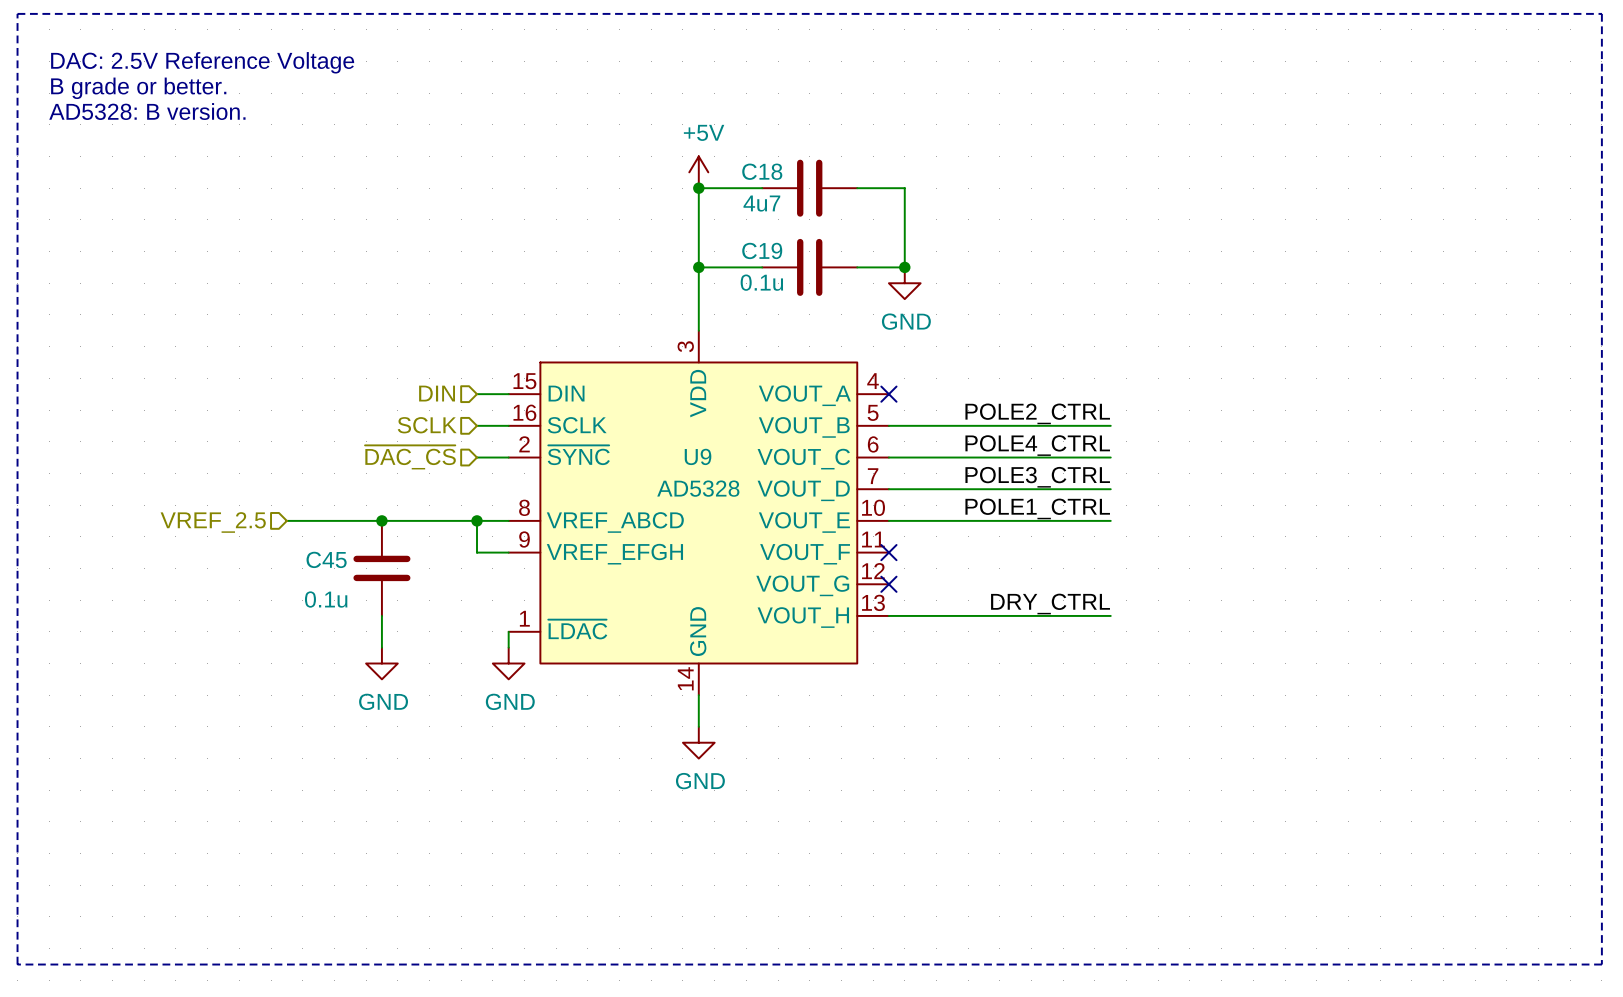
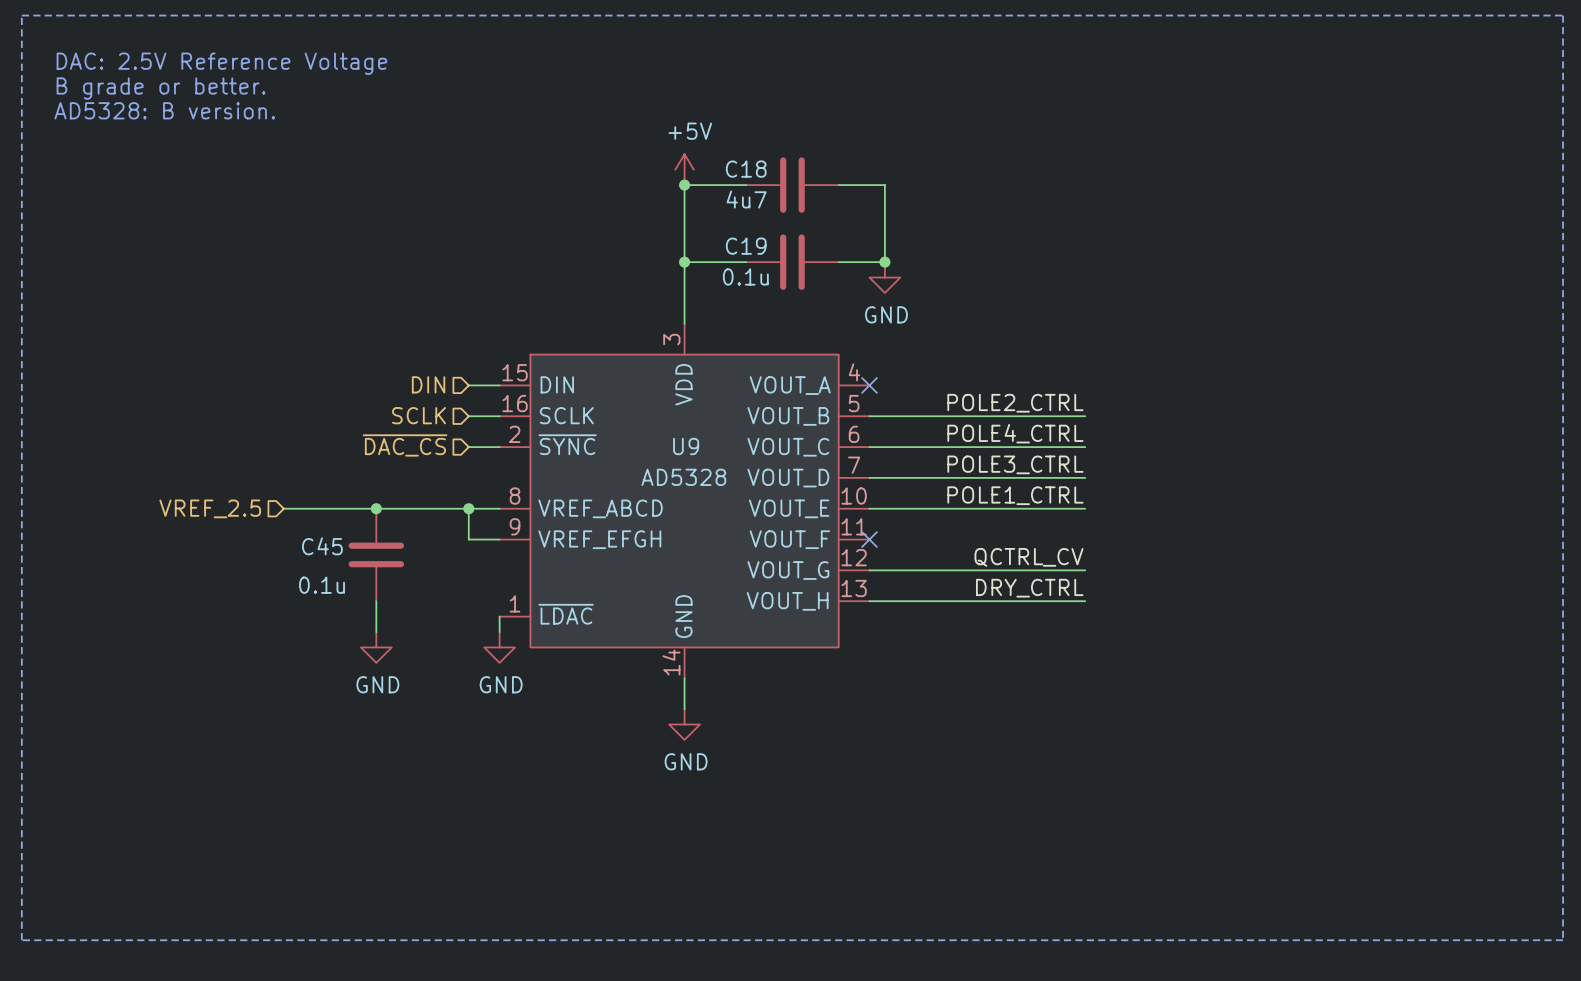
label: none -> QCTRL_CV (1029, 557)
wire: none -> (869, 570) (1085, 570)
no-connect mark: (888, 584) -> none

